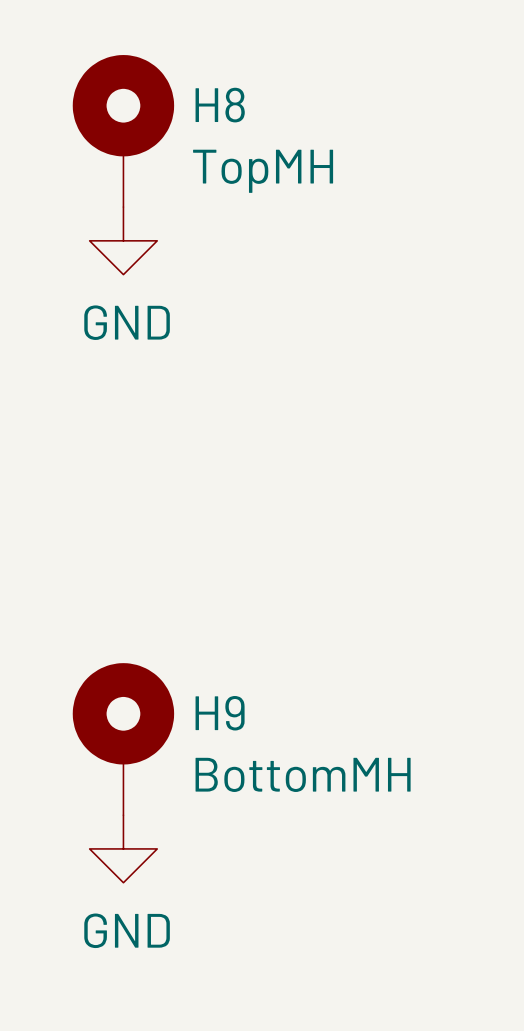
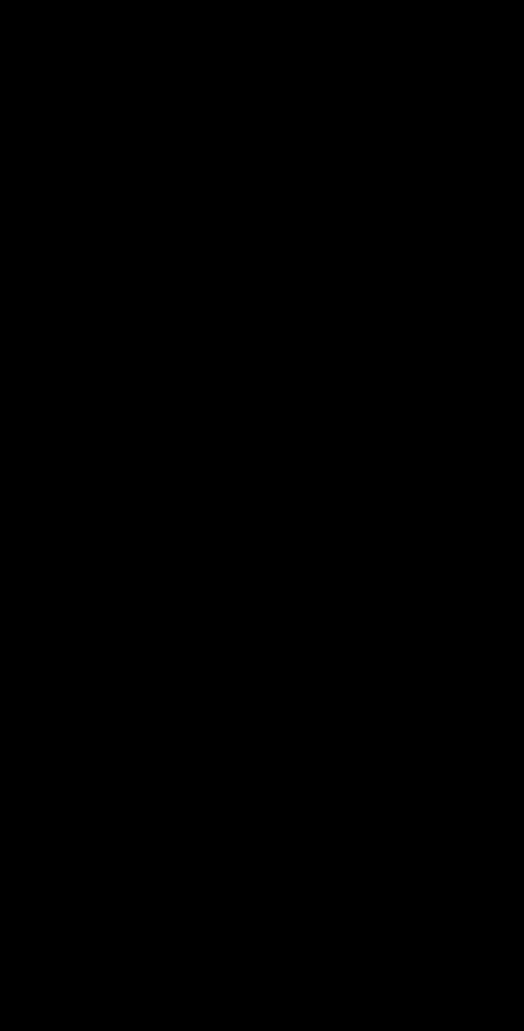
H8: TopMH (123, 131) -> none
power symbol: GND (123, 240) -> none
H9: BottomMH (123, 739) -> none
power symbol: GND (123, 848) -> none

